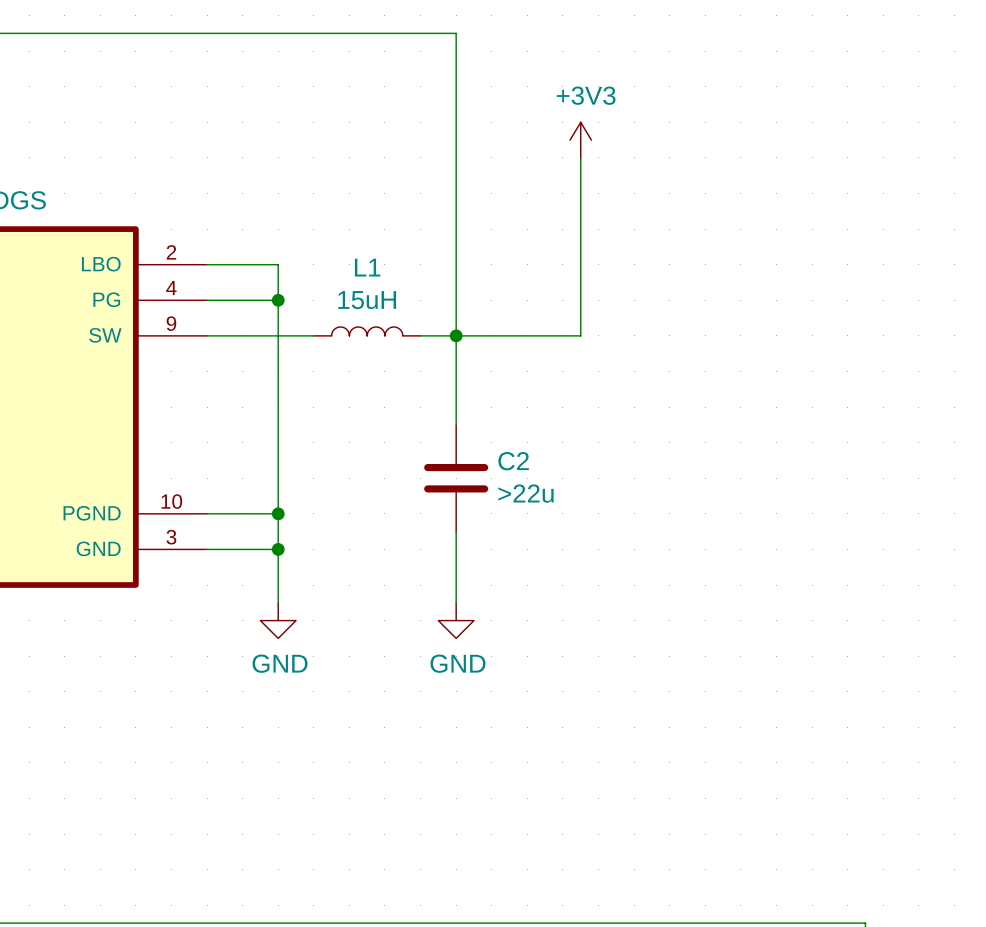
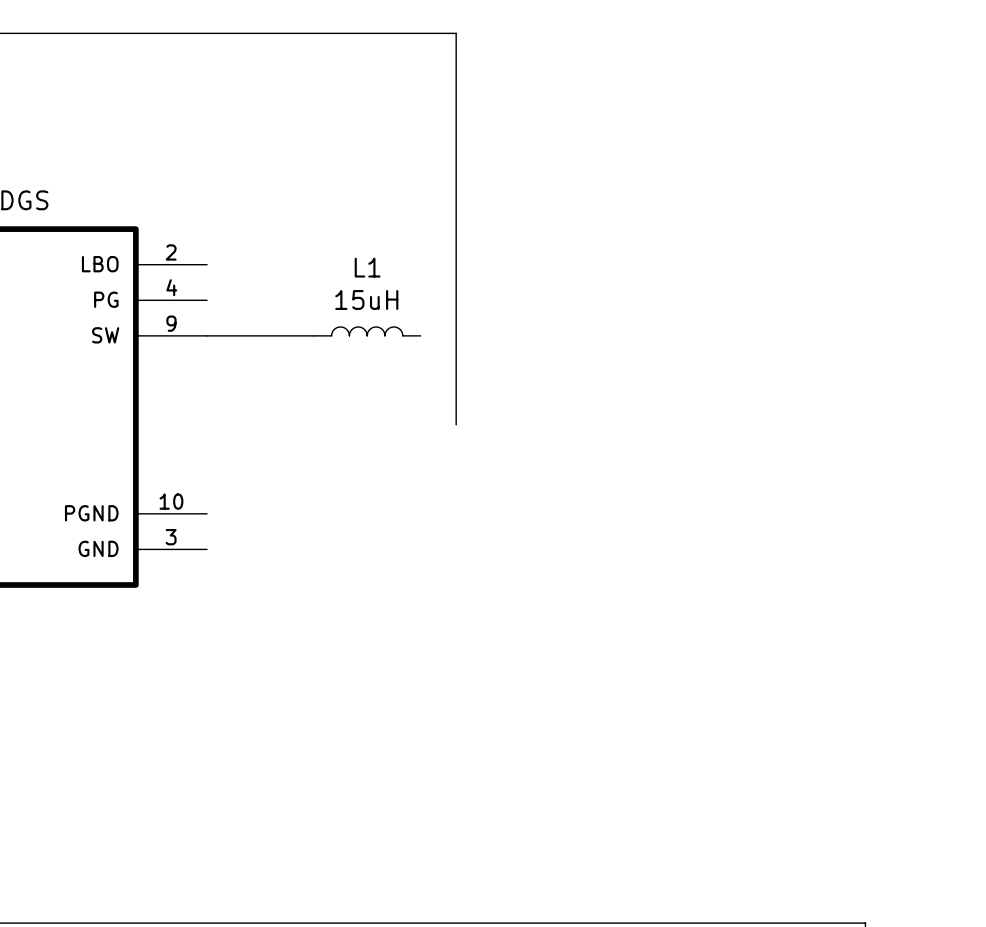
power symbol: +3V3 (580, 140) -> none
wire: (580, 157) (580, 335) (420, 335) -> none
wire: (207, 264) (278, 264) (278, 602) -> none
wire: (207, 300) (278, 300) -> none
junction: (278, 300) -> none
junction: (456, 335) -> none
C2: >22u (456, 478) -> none
wire: (207, 513) (278, 513) -> none
junction: (278, 513) -> none
wire: (456, 531) (456, 602) -> none
wire: (207, 549) (278, 549) -> none
junction: (278, 549) -> none
power symbol: GND (278, 620) -> none
power symbol: GND (456, 620) -> none

